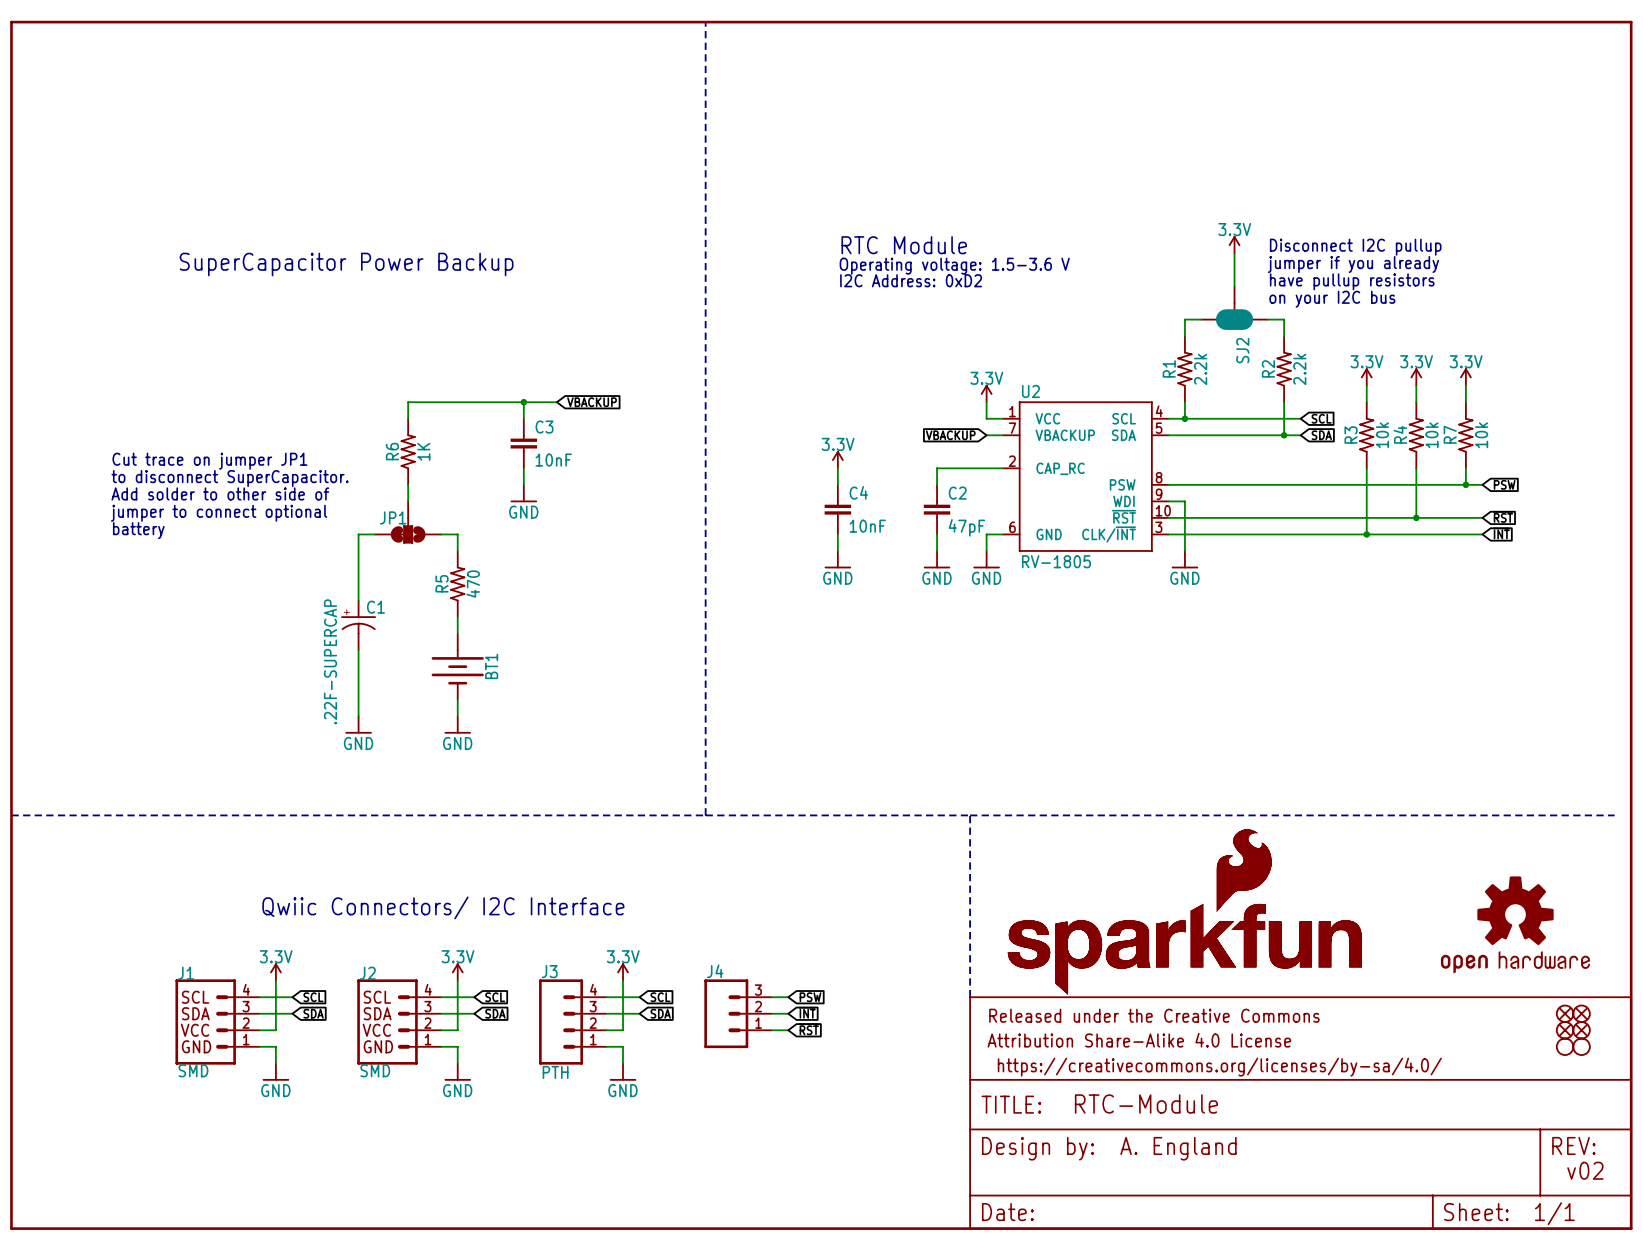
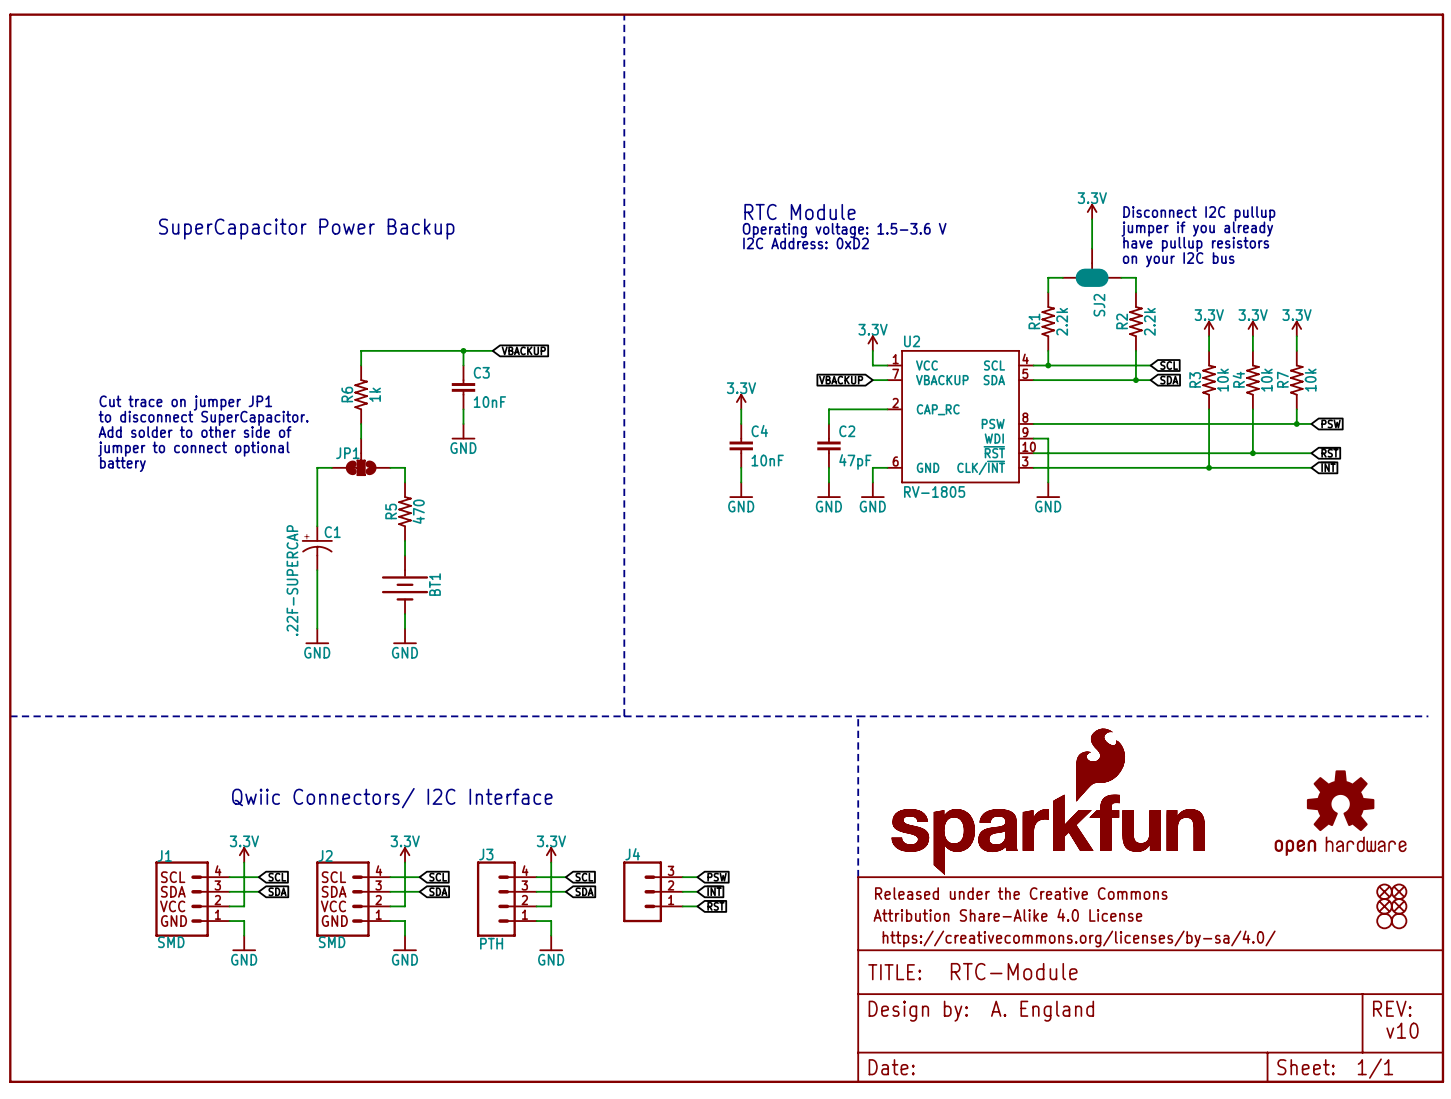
R6 value: 1K (423, 451) -> 1k (375, 394)
text: v02 (1585, 1170) -> v10 (1402, 1030)

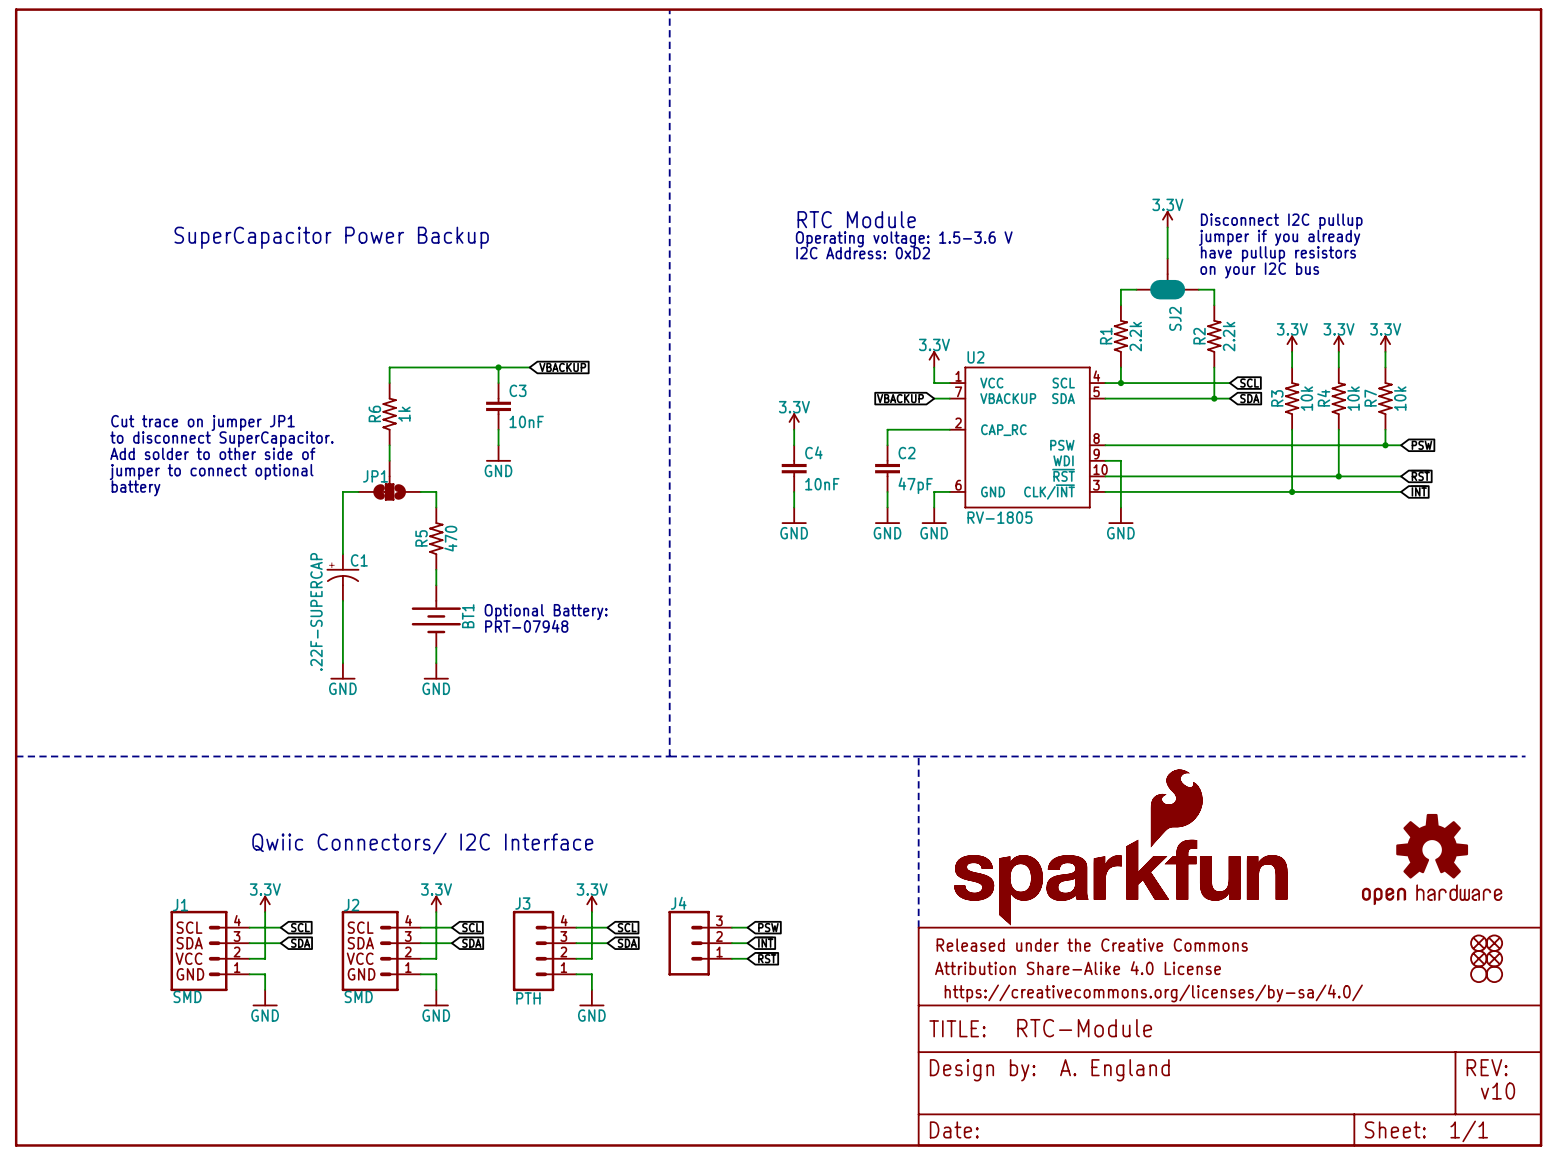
text: none -> Optional Battery: (546, 612)
text: none -> PRT-07948 (526, 626)

